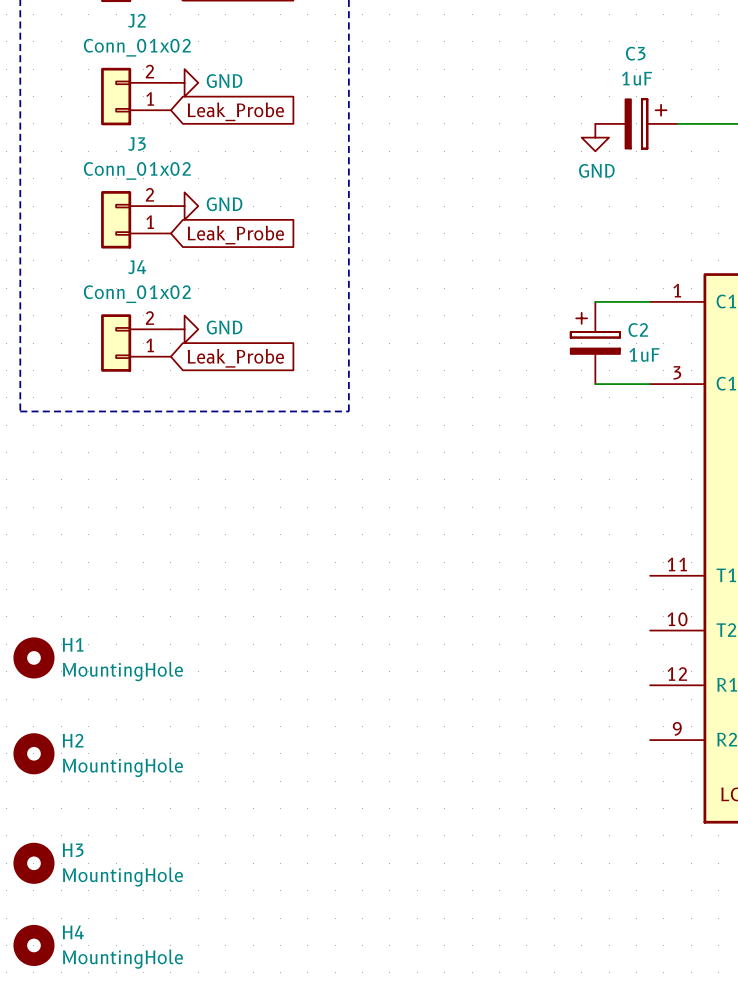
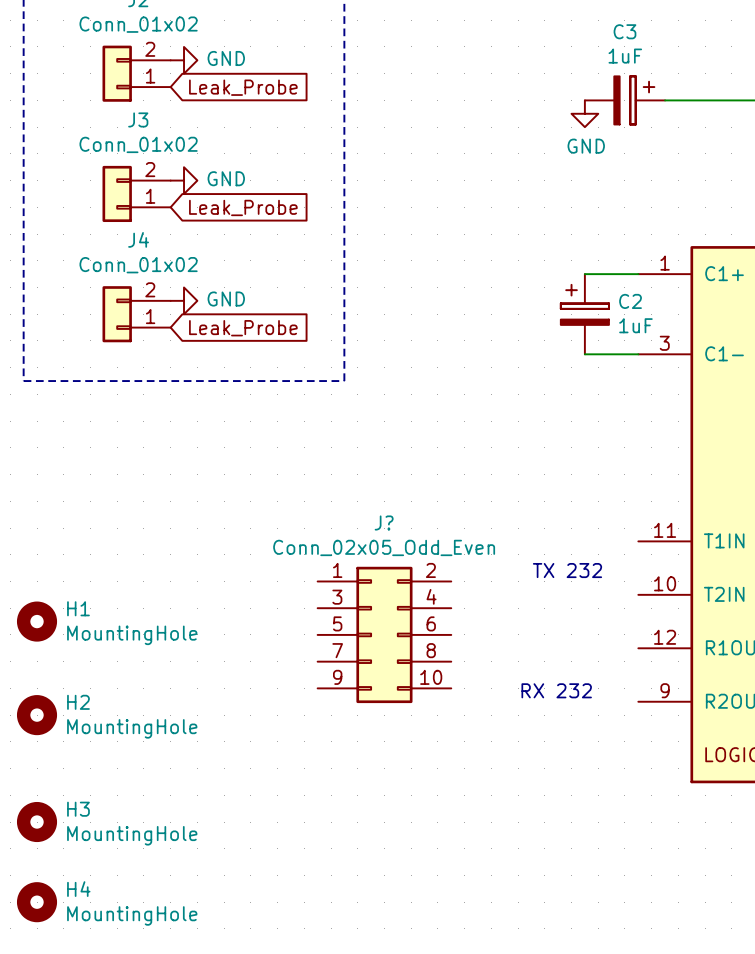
text: none -> TX 232 (567, 570)
J?: none -> Conn_02x05_Odd_Even (384, 634)
text: none -> RX 232 (556, 690)

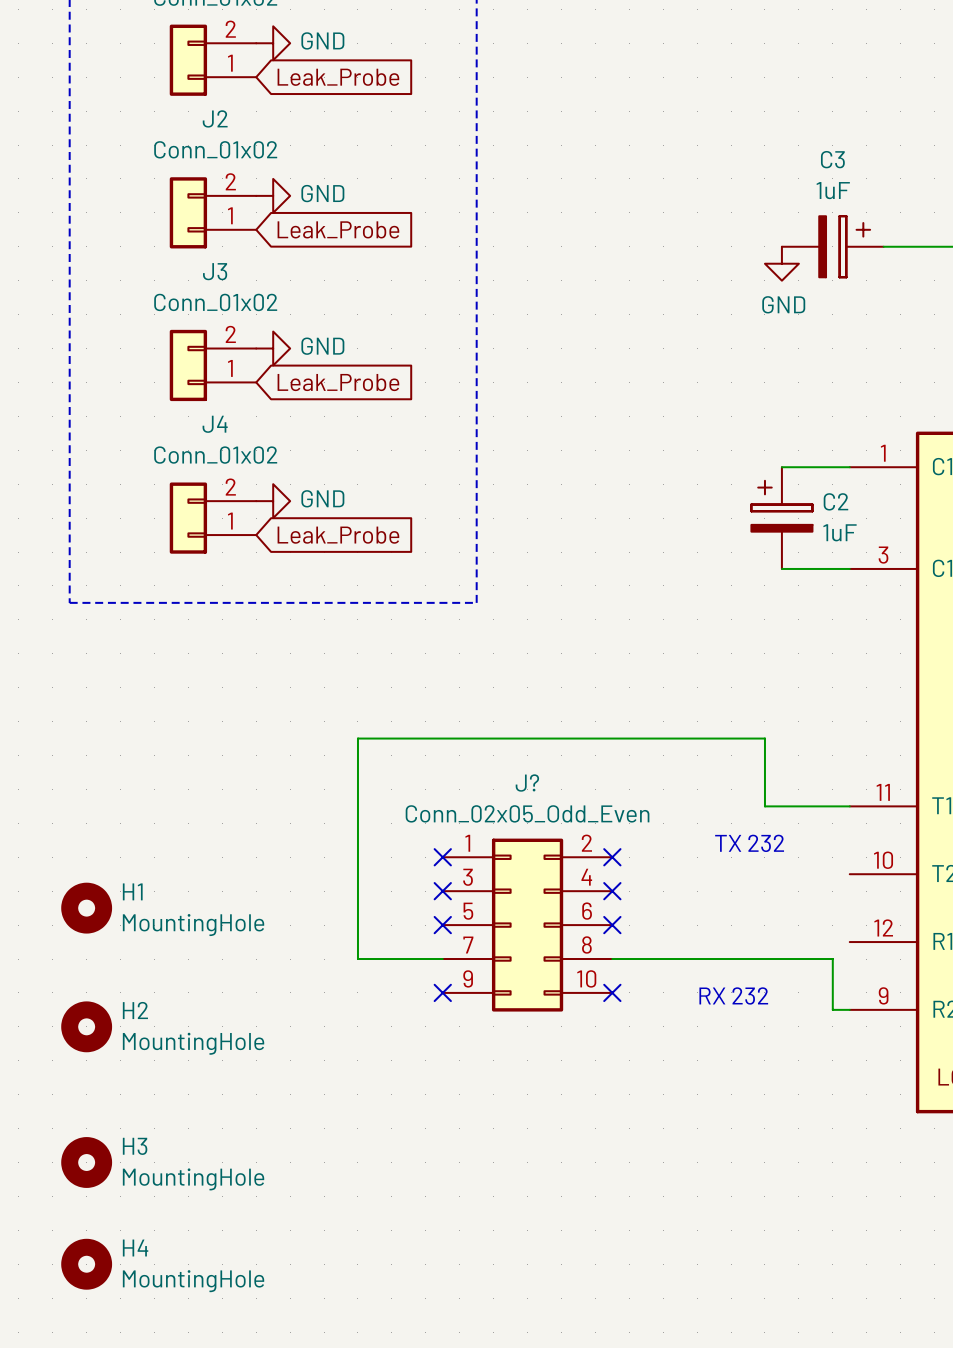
wire: none -> (849, 806) (764, 806) (764, 738) (357, 738) (357, 959) (442, 959)
no-connect mark: none -> (442, 857)
no-connect mark: none -> (612, 857)
no-connect mark: none -> (442, 891)
no-connect mark: none -> (612, 891)
no-connect mark: none -> (442, 925)
no-connect mark: none -> (612, 925)
wire: none -> (612, 959) (832, 959) (832, 1009) (849, 1009)
no-connect mark: none -> (442, 992)
no-connect mark: none -> (612, 992)

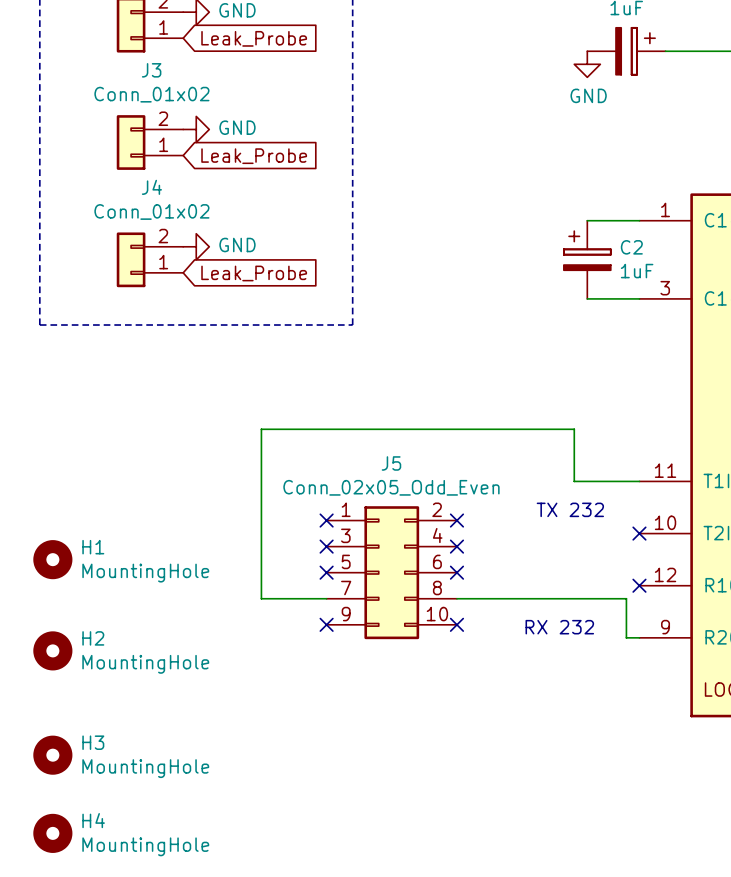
J? name: J? (527, 783) -> J5 (391, 463)
no-connect mark: none -> (639, 533)
no-connect mark: none -> (639, 585)

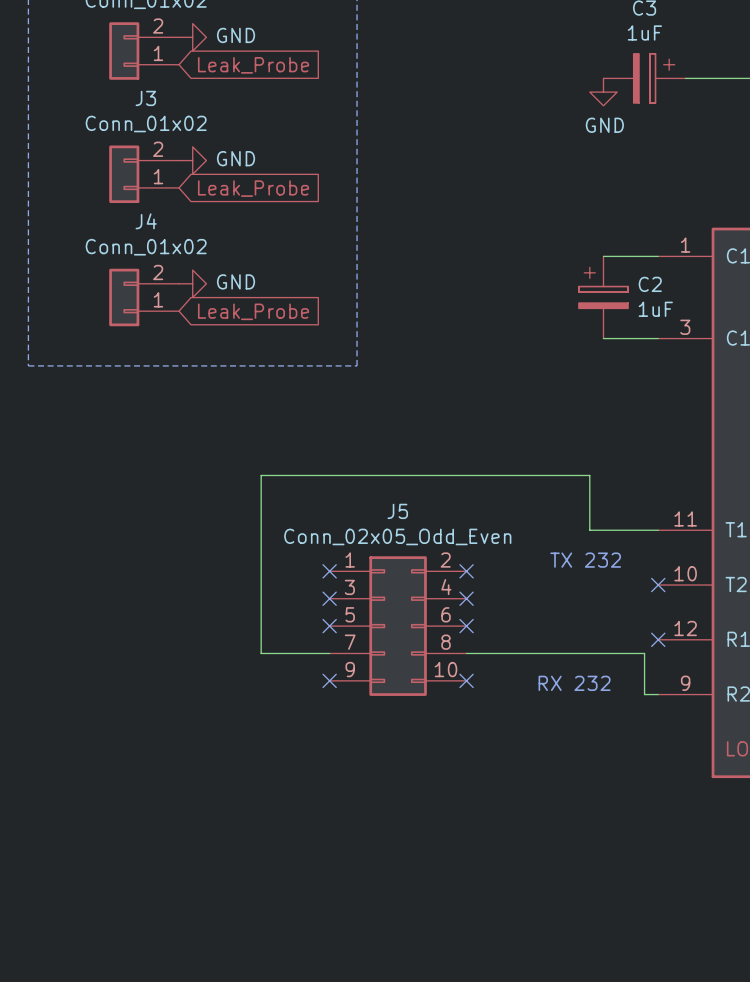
H1: MountingHole (52, 559) -> none
H2: MountingHole (52, 650) -> none
H3: MountingHole (52, 755) -> none
H4: MountingHole (52, 833) -> none

